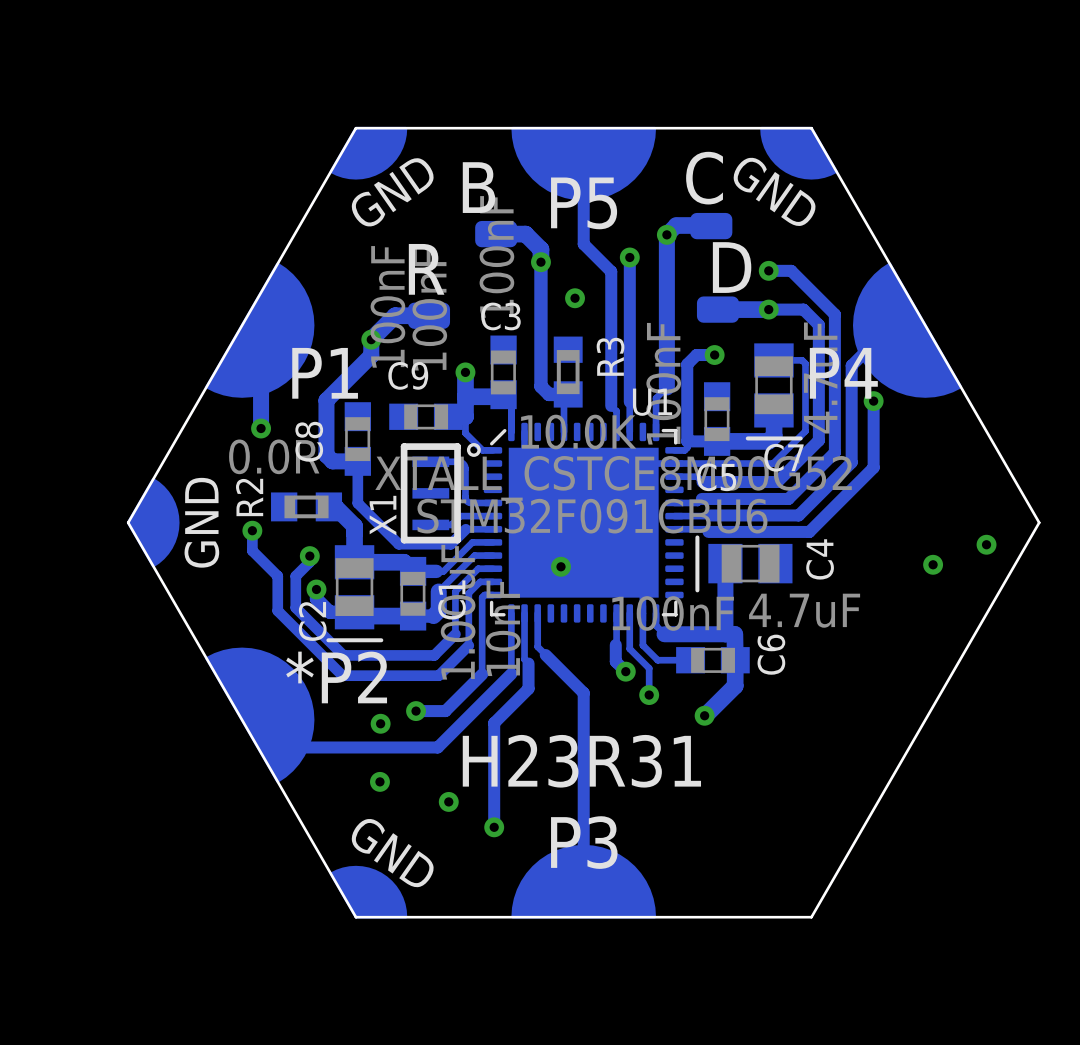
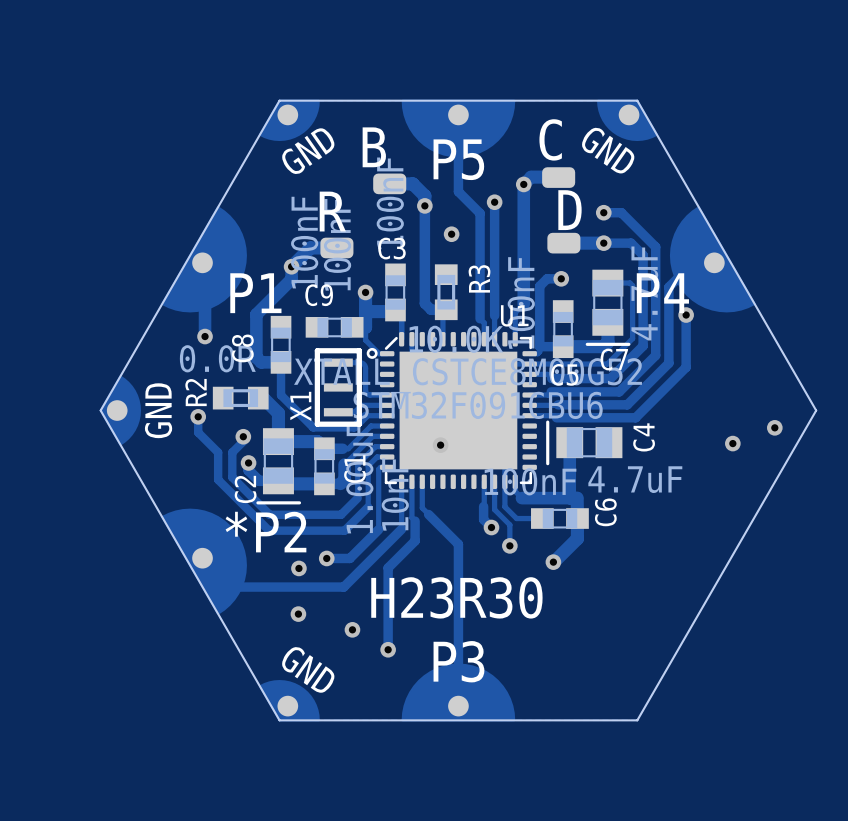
text: H23R31 (581, 761) -> H23R30 (456, 597)

